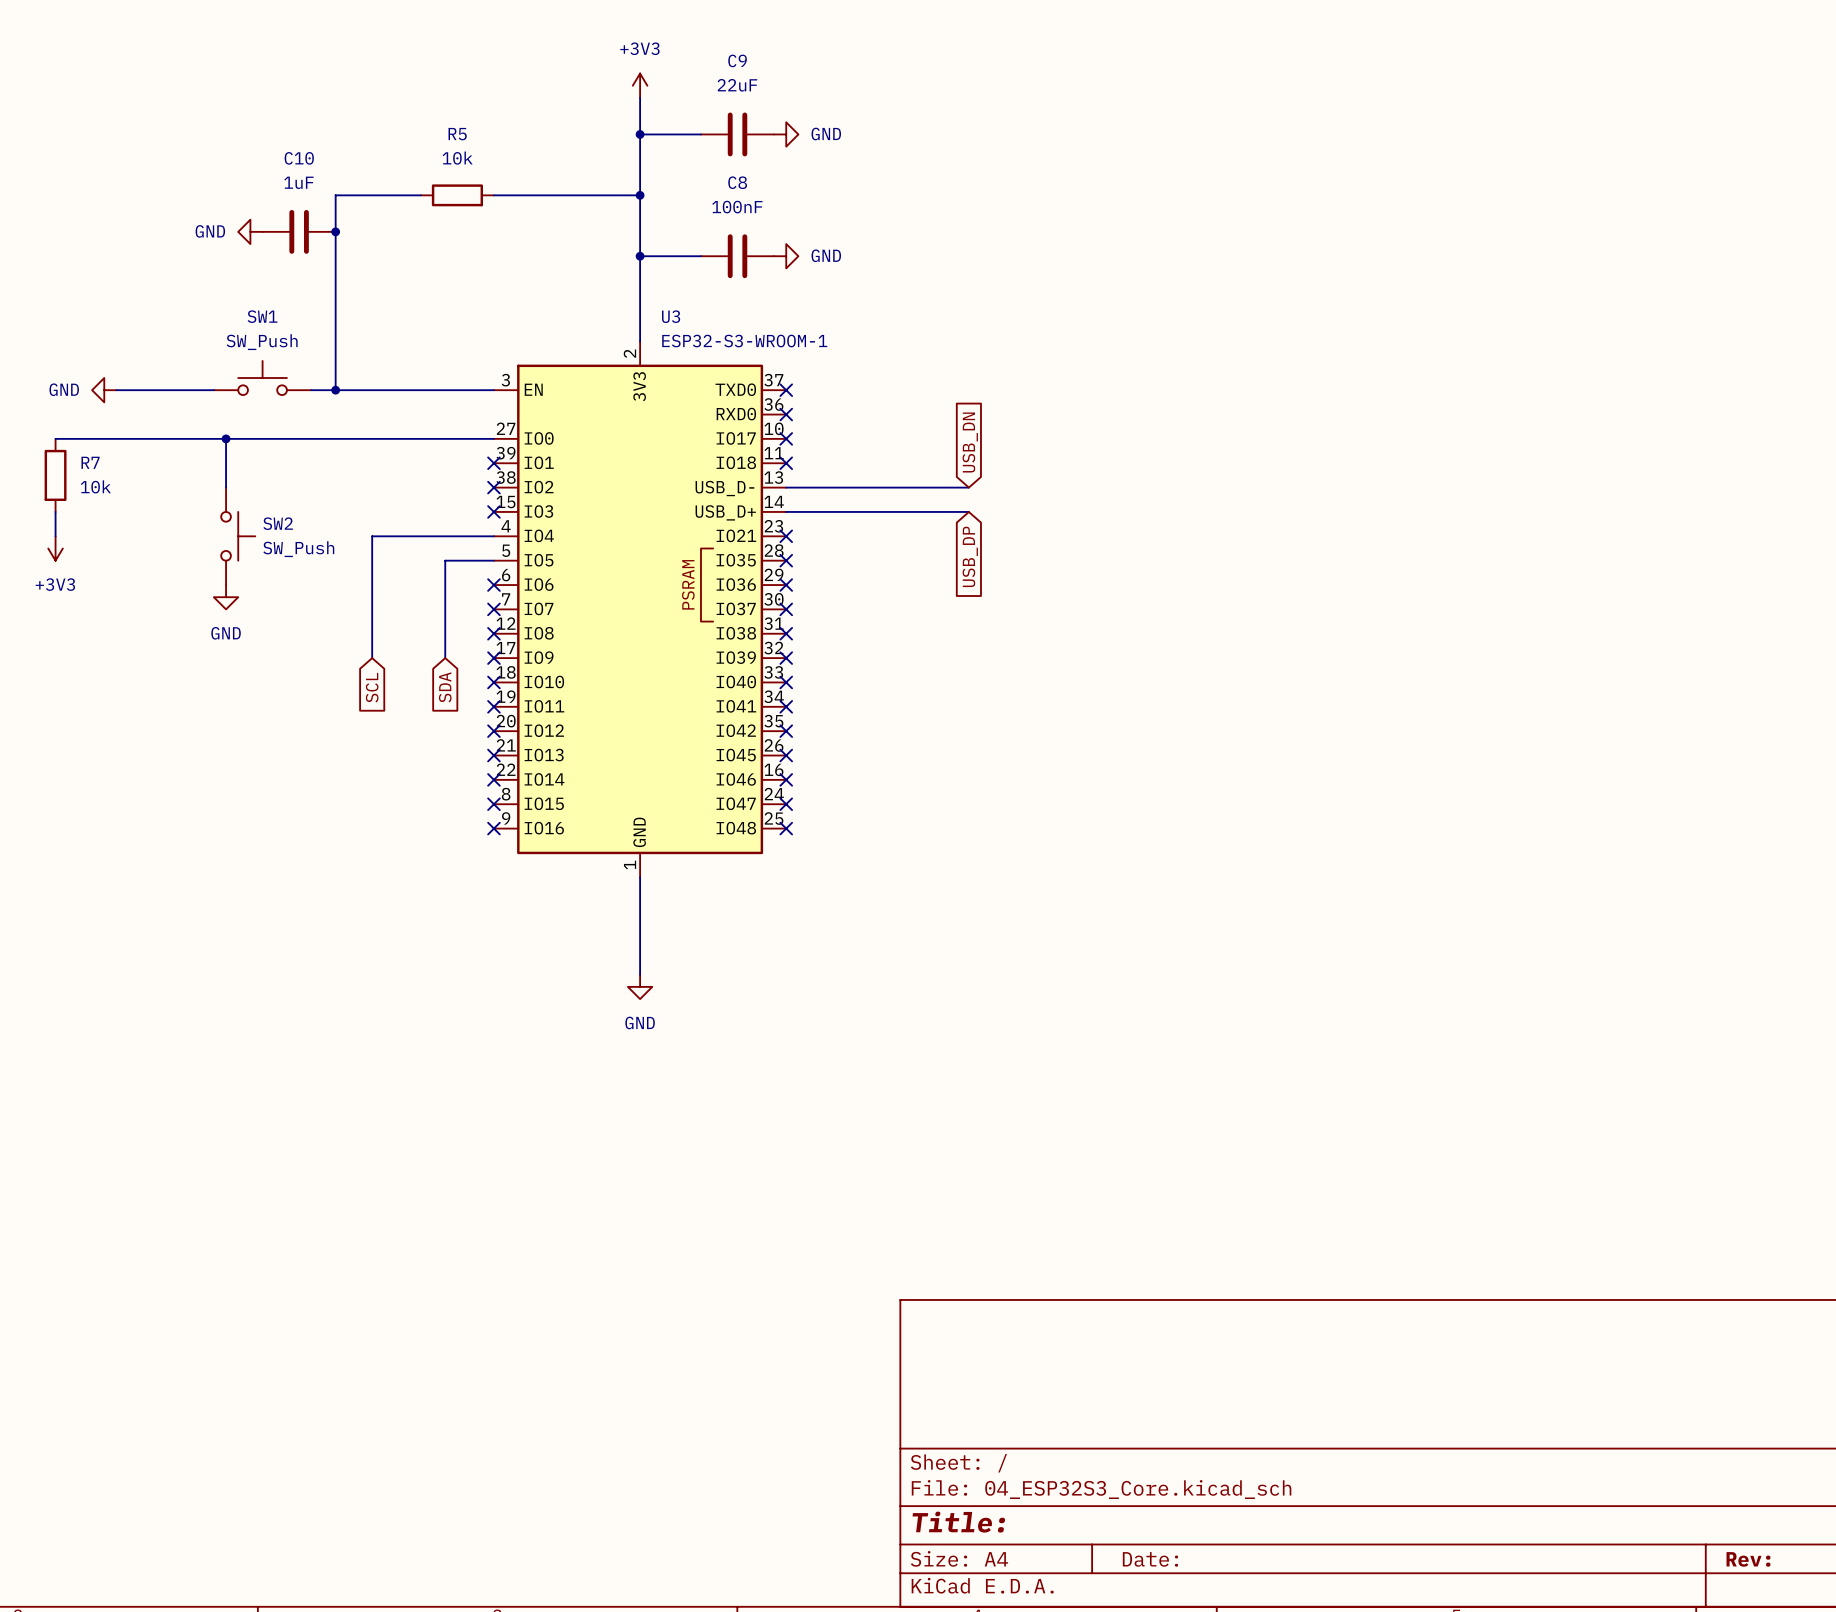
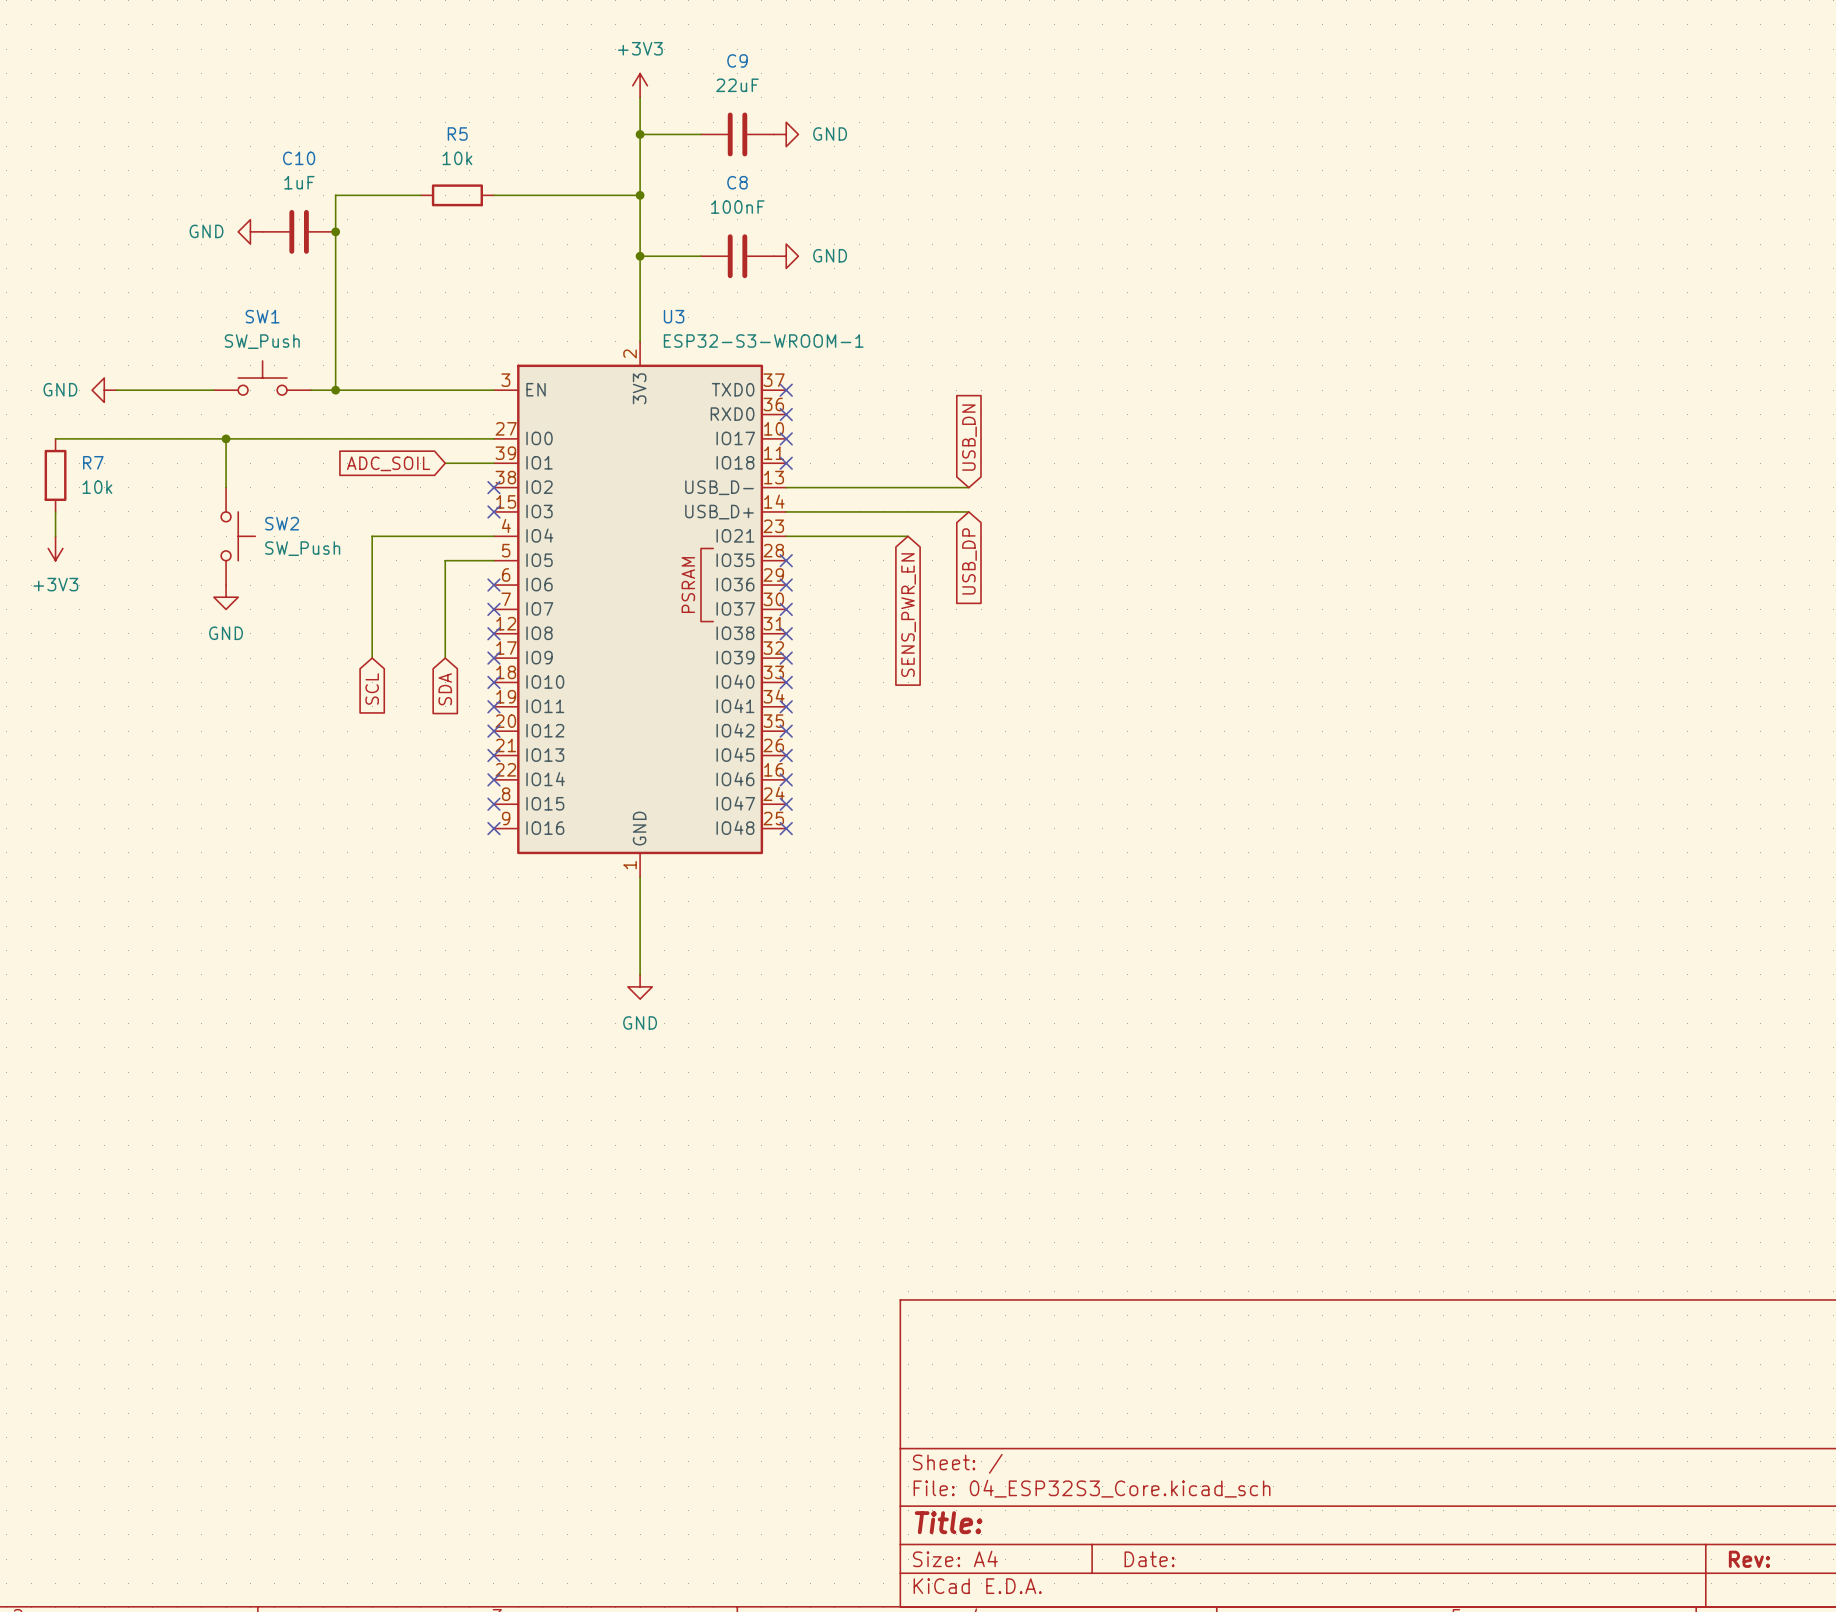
wire: none -> (445, 463) (493, 463)
no-connect mark: (493, 463) -> none
global label: none -> ADC_SOIL (388, 463)
wire: none -> (786, 536) (908, 536)
no-connect mark: (786, 536) -> none
global label: none -> SENS_PWR_EN (908, 615)

